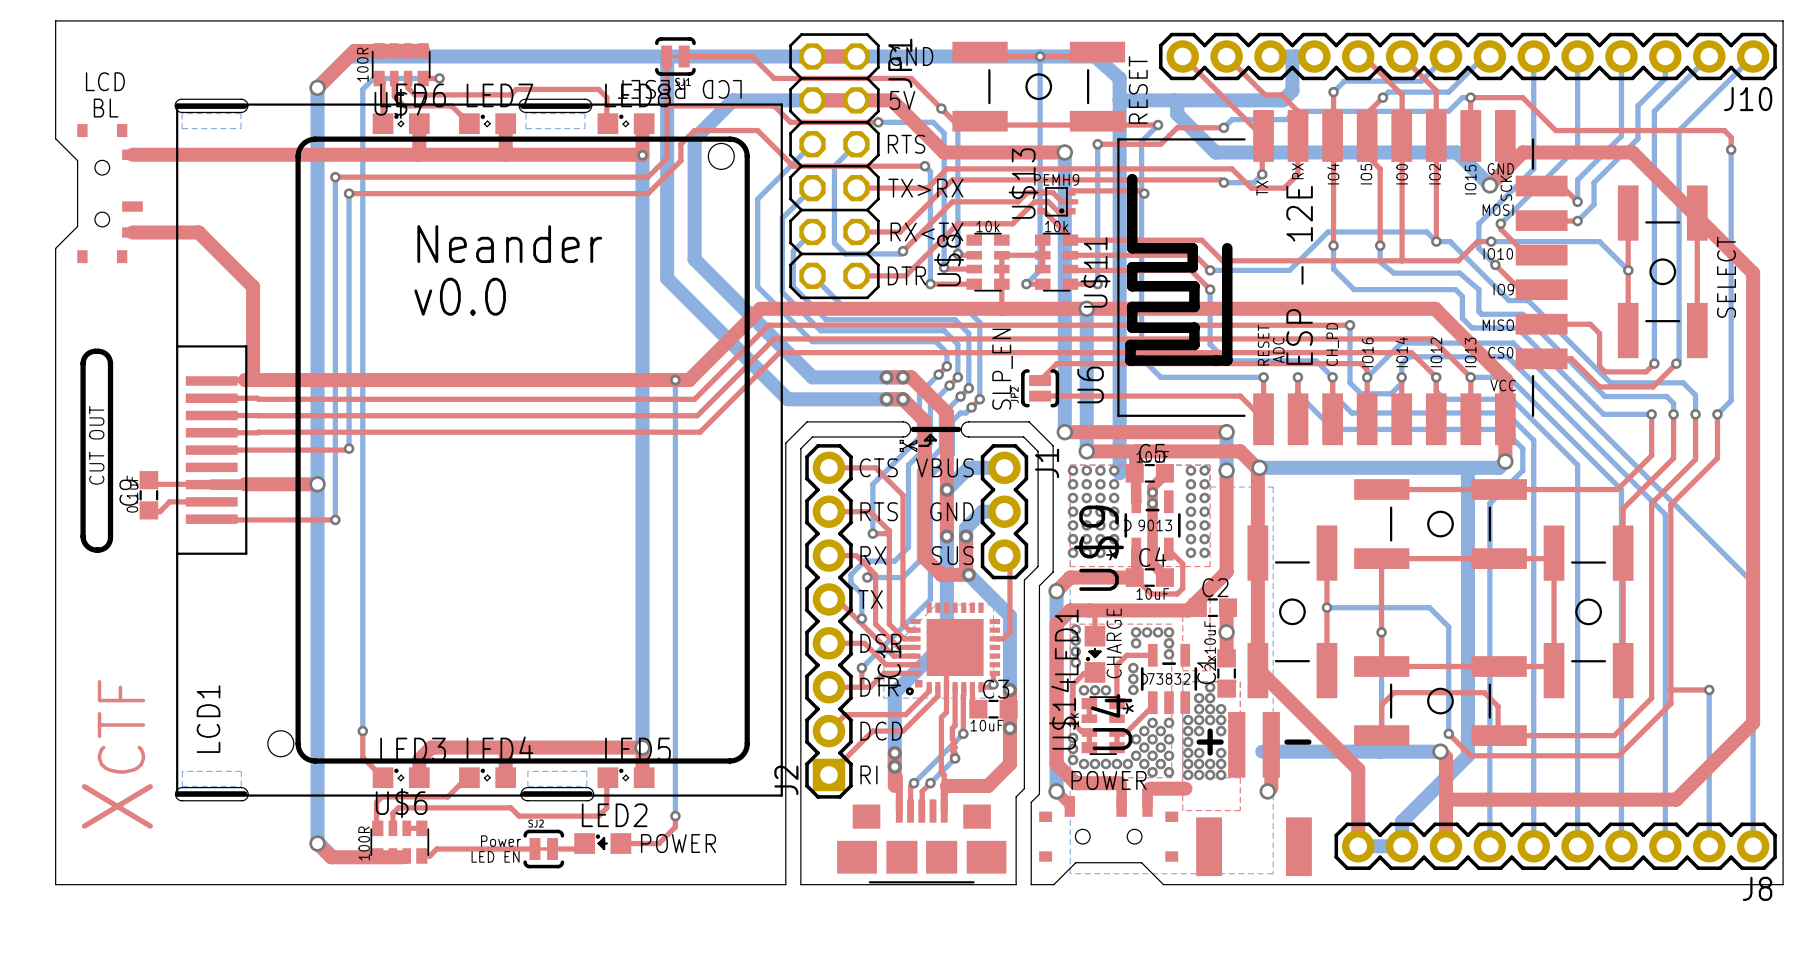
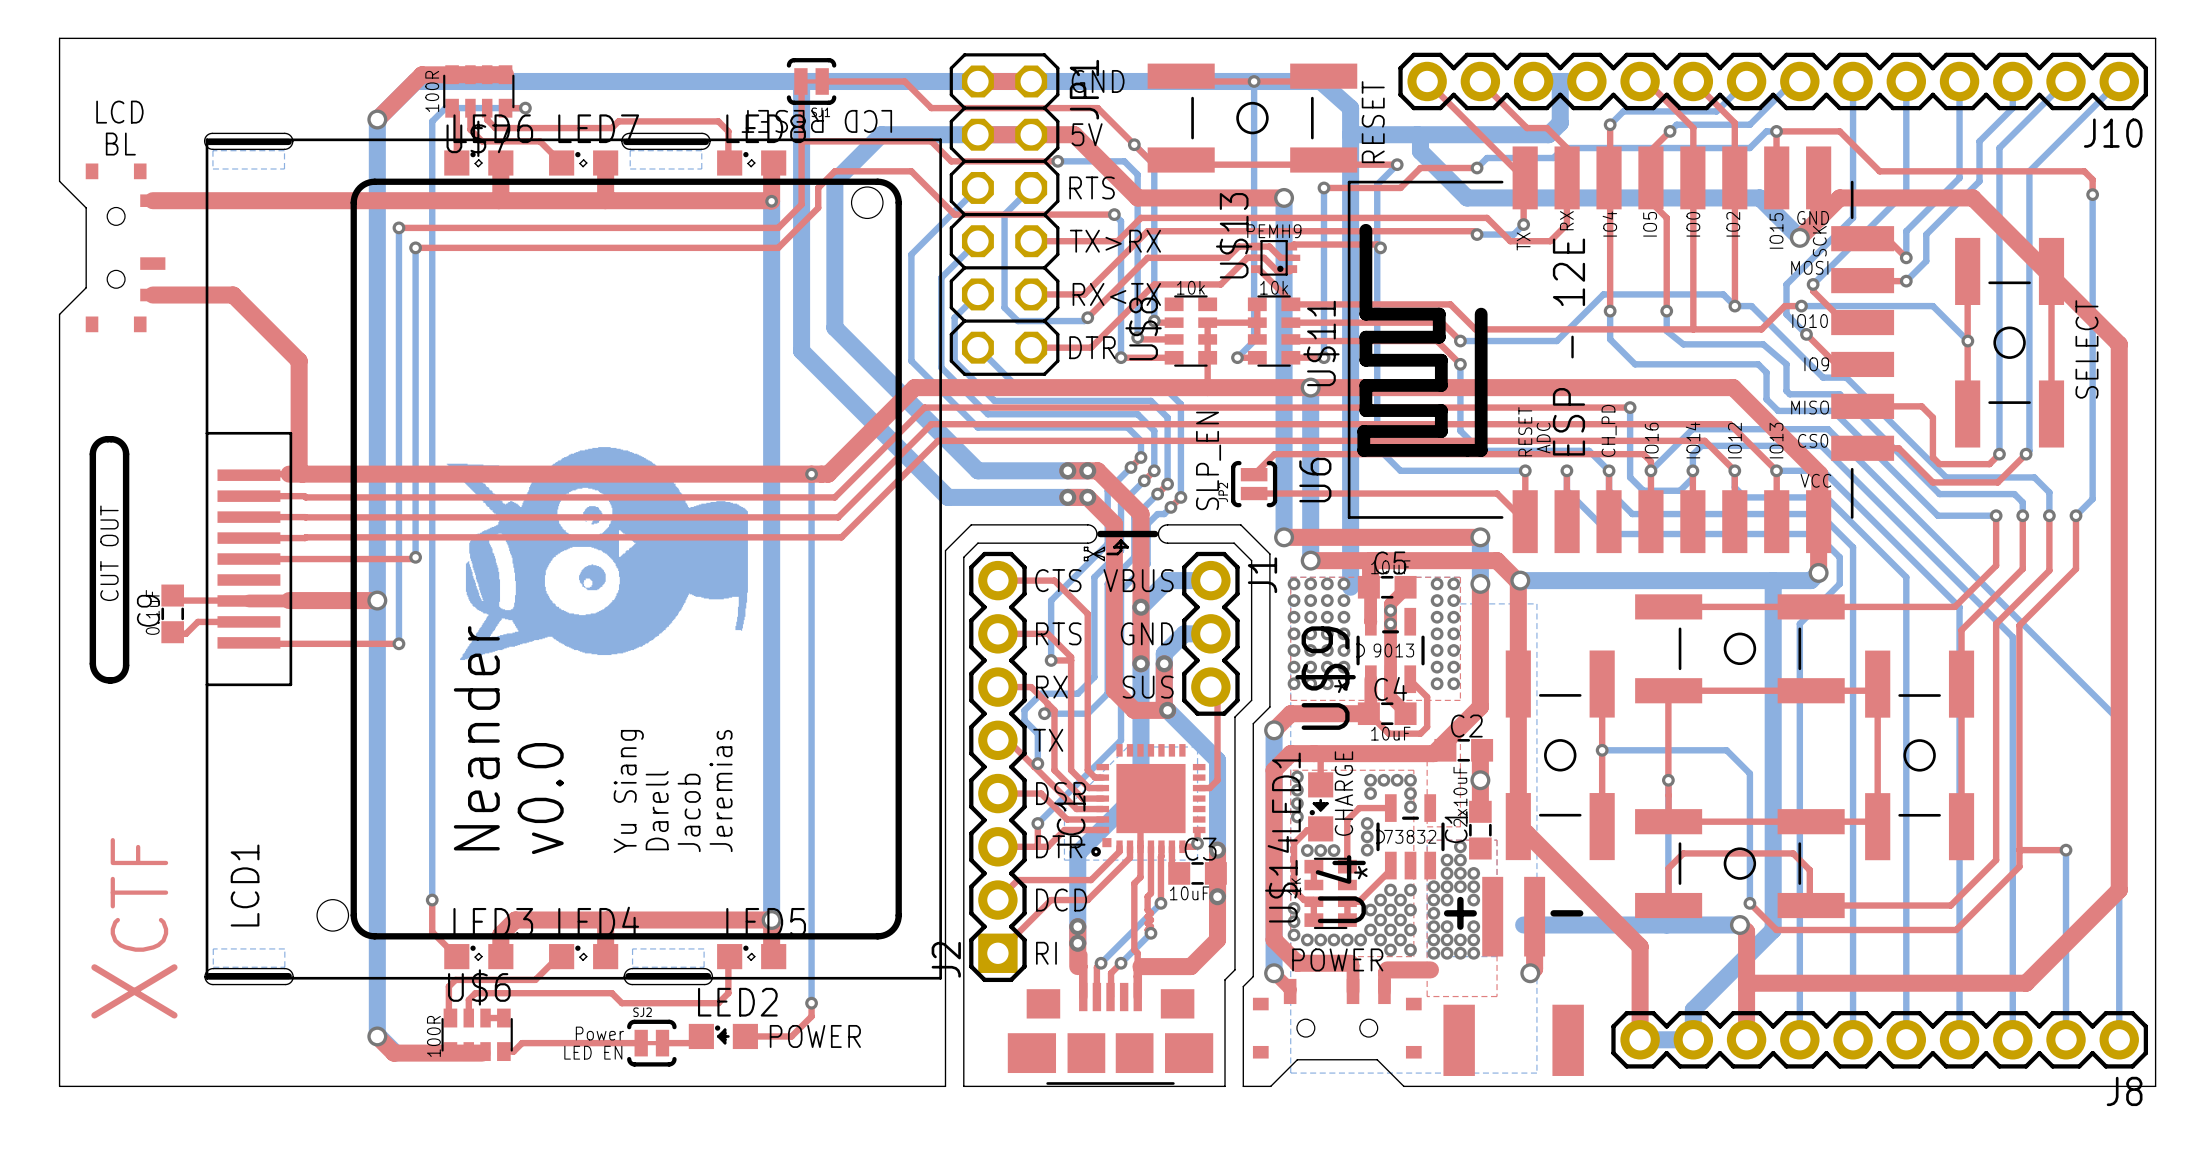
text: Neander (509, 244) -> none
text rotation: 0° (460, 296) -> 90° counterclockwise (540, 798)
text position: v0.0 (460, 296) -> v0.0 (540, 798)
drawing: none -> [446, 447, 748, 661]
text: none -> Neander (476, 738)
text: none -> Yu Siang (628, 791)
text: none -> Jeremias (721, 791)
text: none -> Darell (657, 810)
text: none -> Jacob (689, 812)

